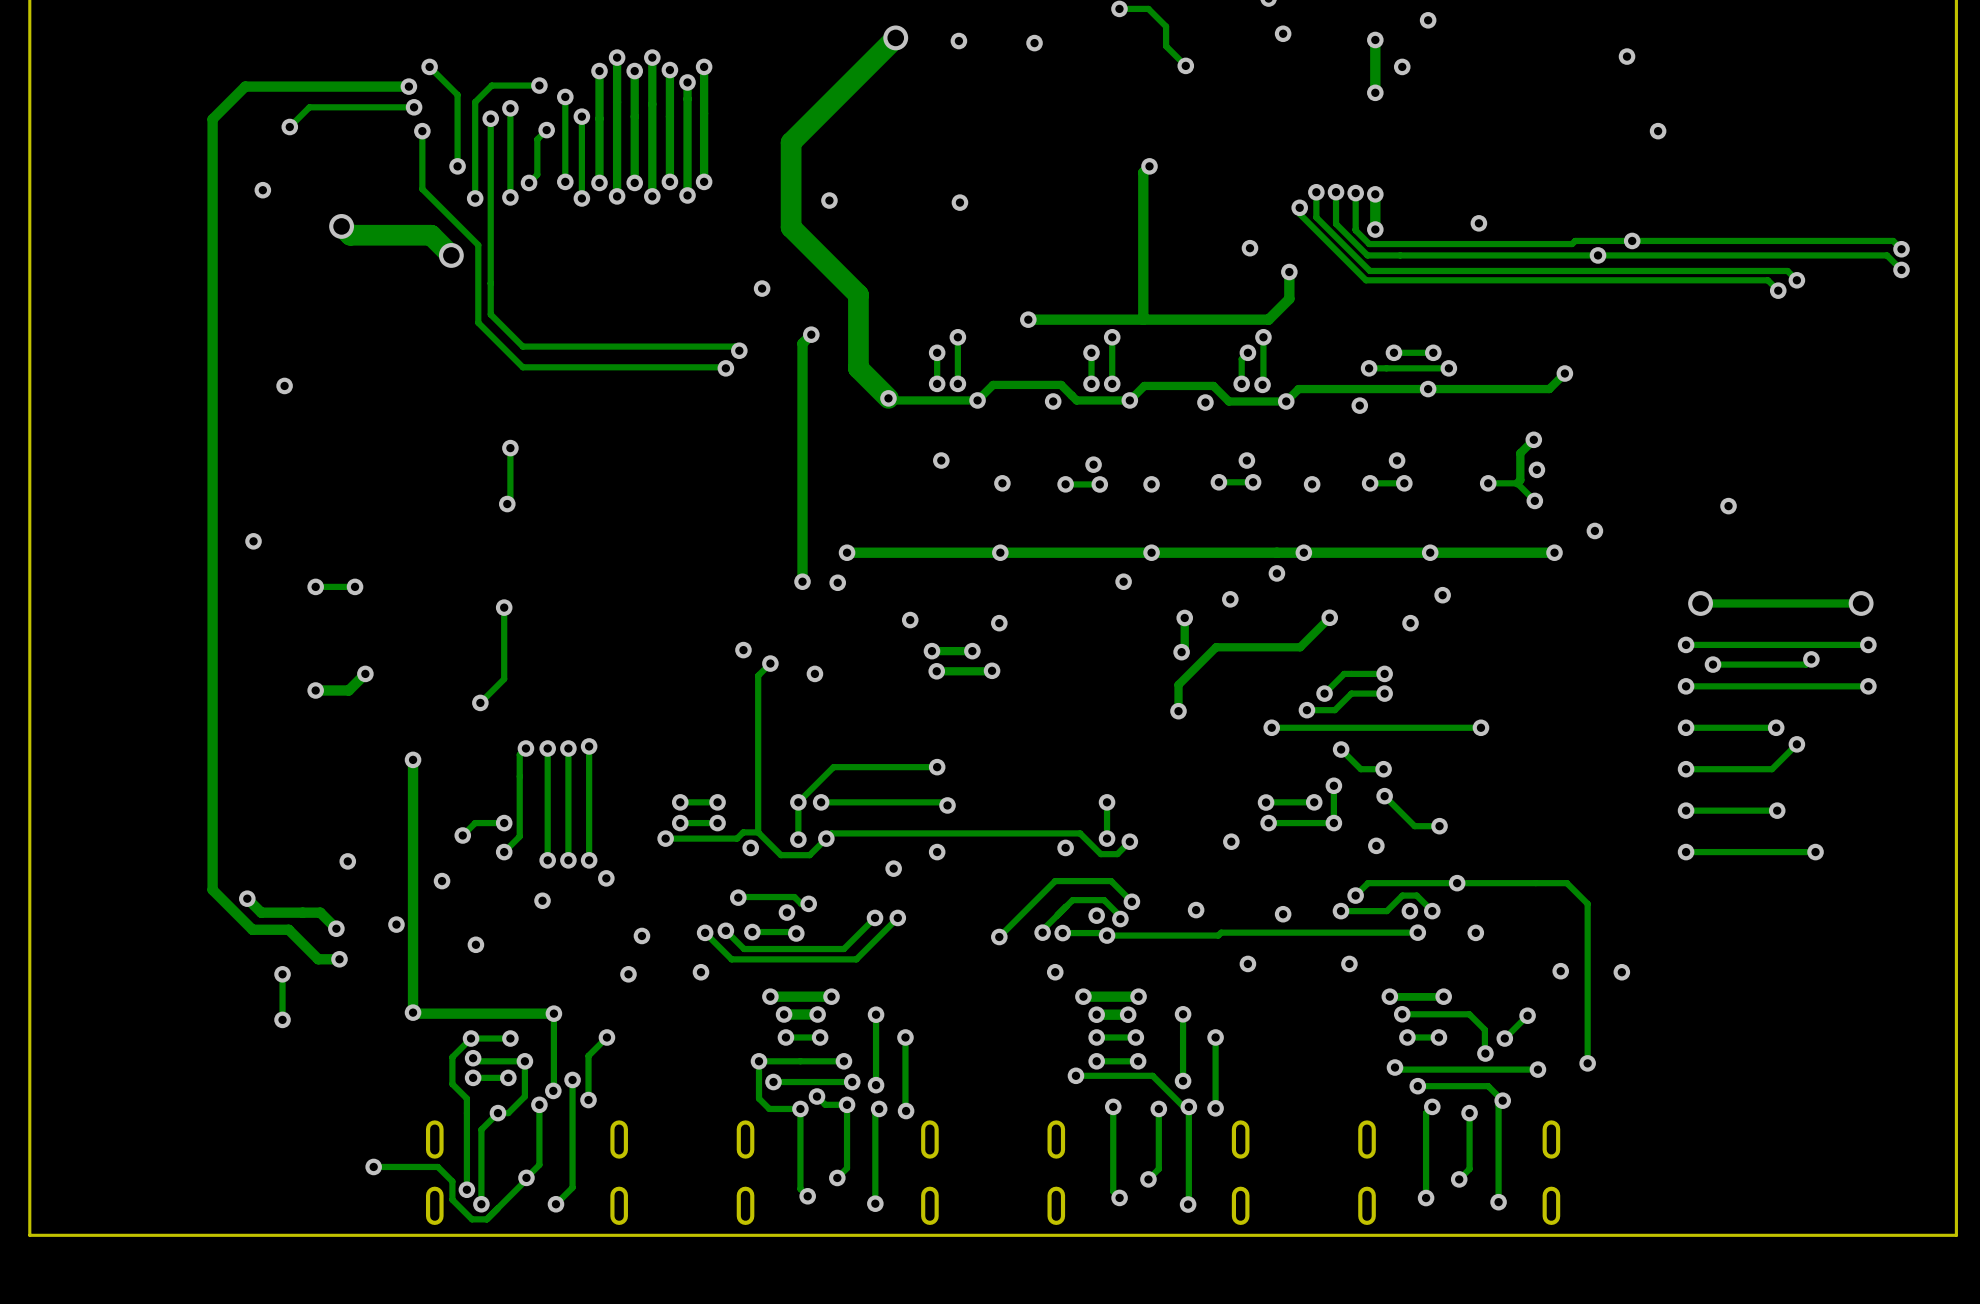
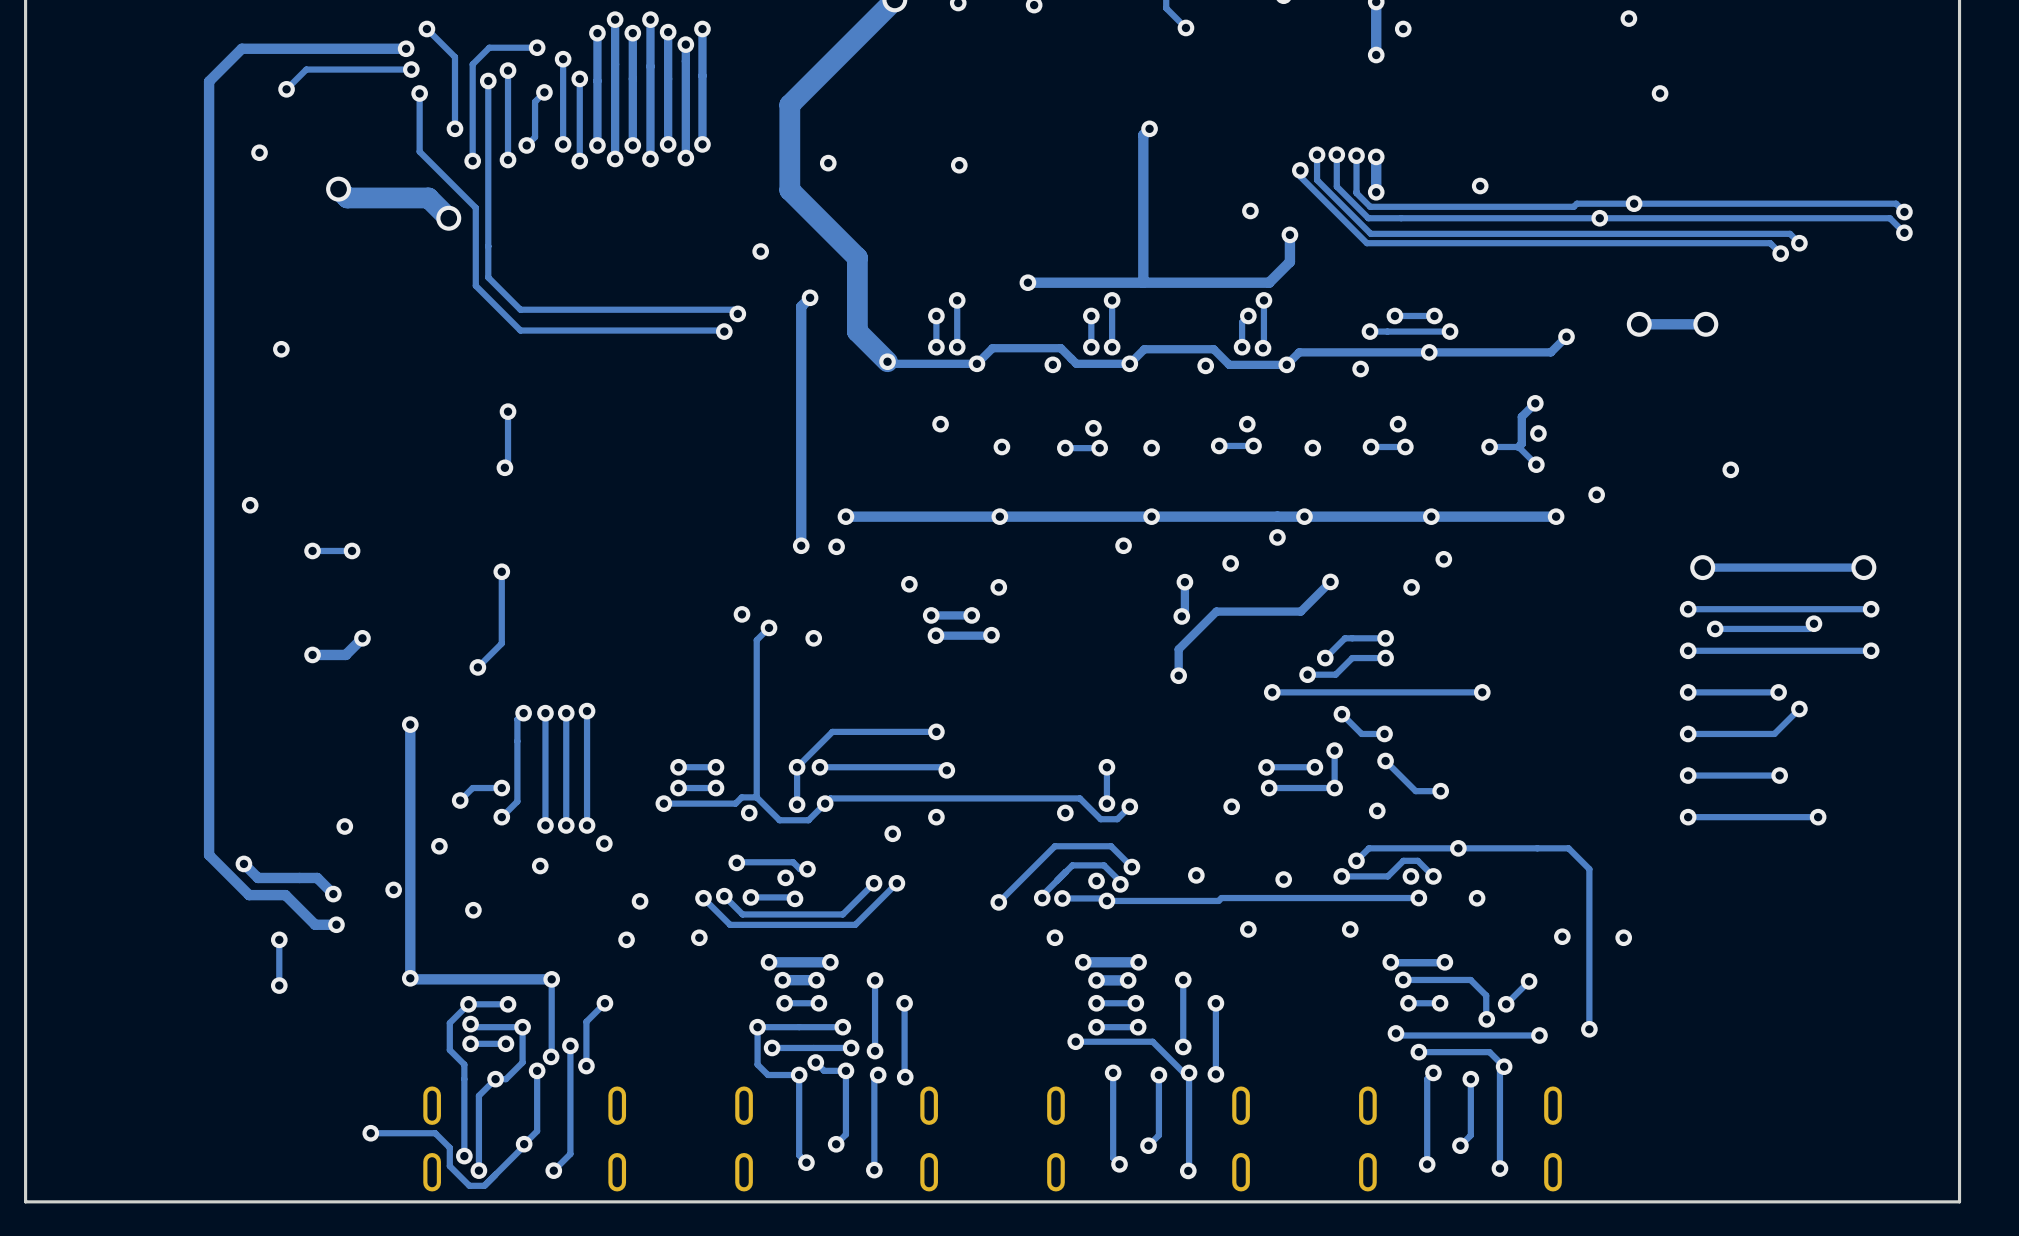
via: none -> (1639, 324)
track: none -> (1705, 324) (1639, 324)
via: none -> (1705, 324)

